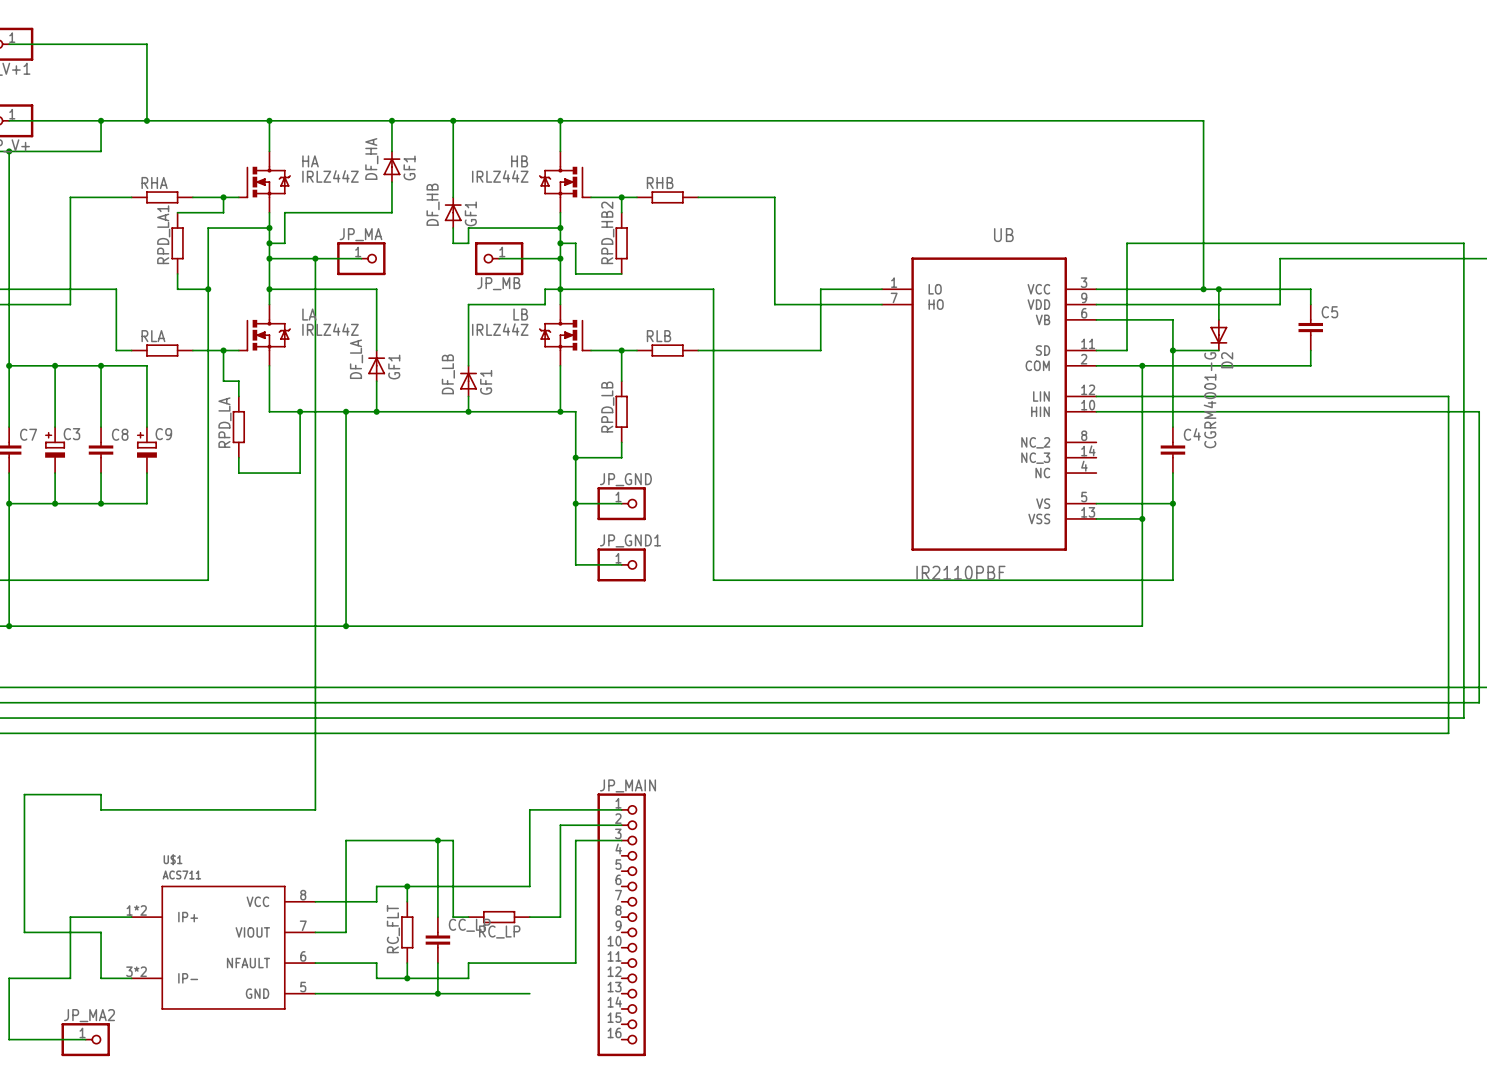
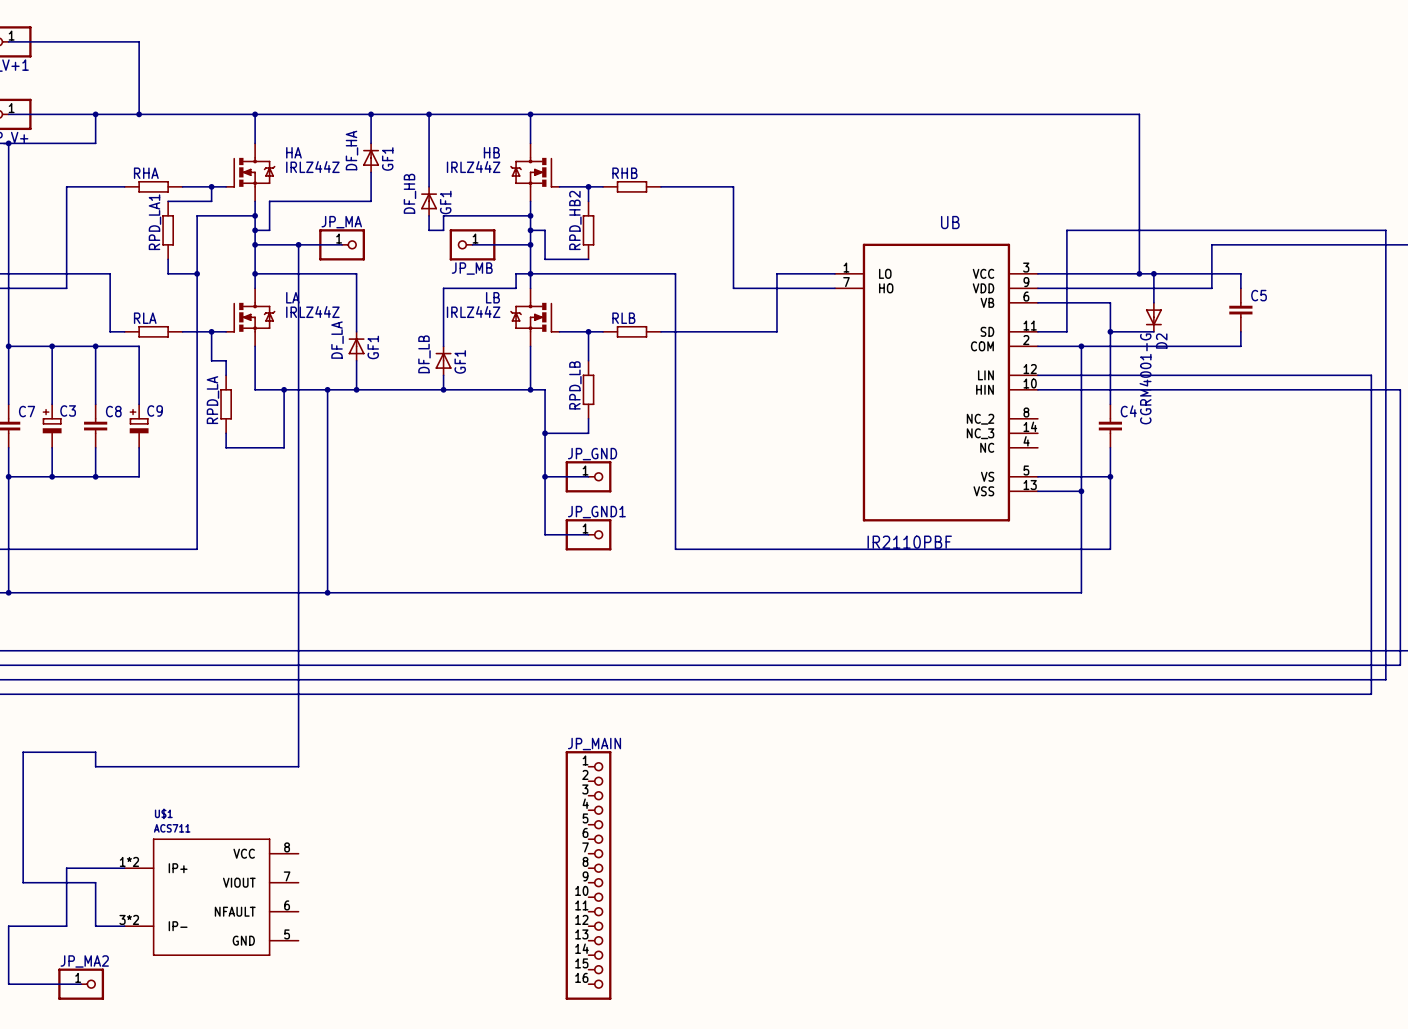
wire: (621, 809) (529, 809) (529, 886) (376, 886) (376, 901) (315, 901) -> none
wire: (621, 825) (560, 825) (560, 917) (529, 917) -> none
wire: (437, 840) (437, 917) -> none
junction: (437, 840) -> none
wire: (621, 840) (575, 840) (575, 963) (468, 963) (468, 978) (376, 978) (376, 963) (315, 963) -> none
wire: (407, 886) (407, 901) -> none
junction: (407, 886) -> none
wire: (468, 917) (453, 917) (453, 840) (346, 840) (346, 932) (315, 932) -> none
RC_LP: (499, 917) -> none
RC_FLT: (407, 932) -> none
CC_LP: (437, 940) -> none
wire: (407, 963) (407, 978) -> none
wire: (437, 963) (437, 993) -> none
junction: (407, 978) -> none
wire: (315, 993) (529, 993) -> none
junction: (437, 993) -> none

